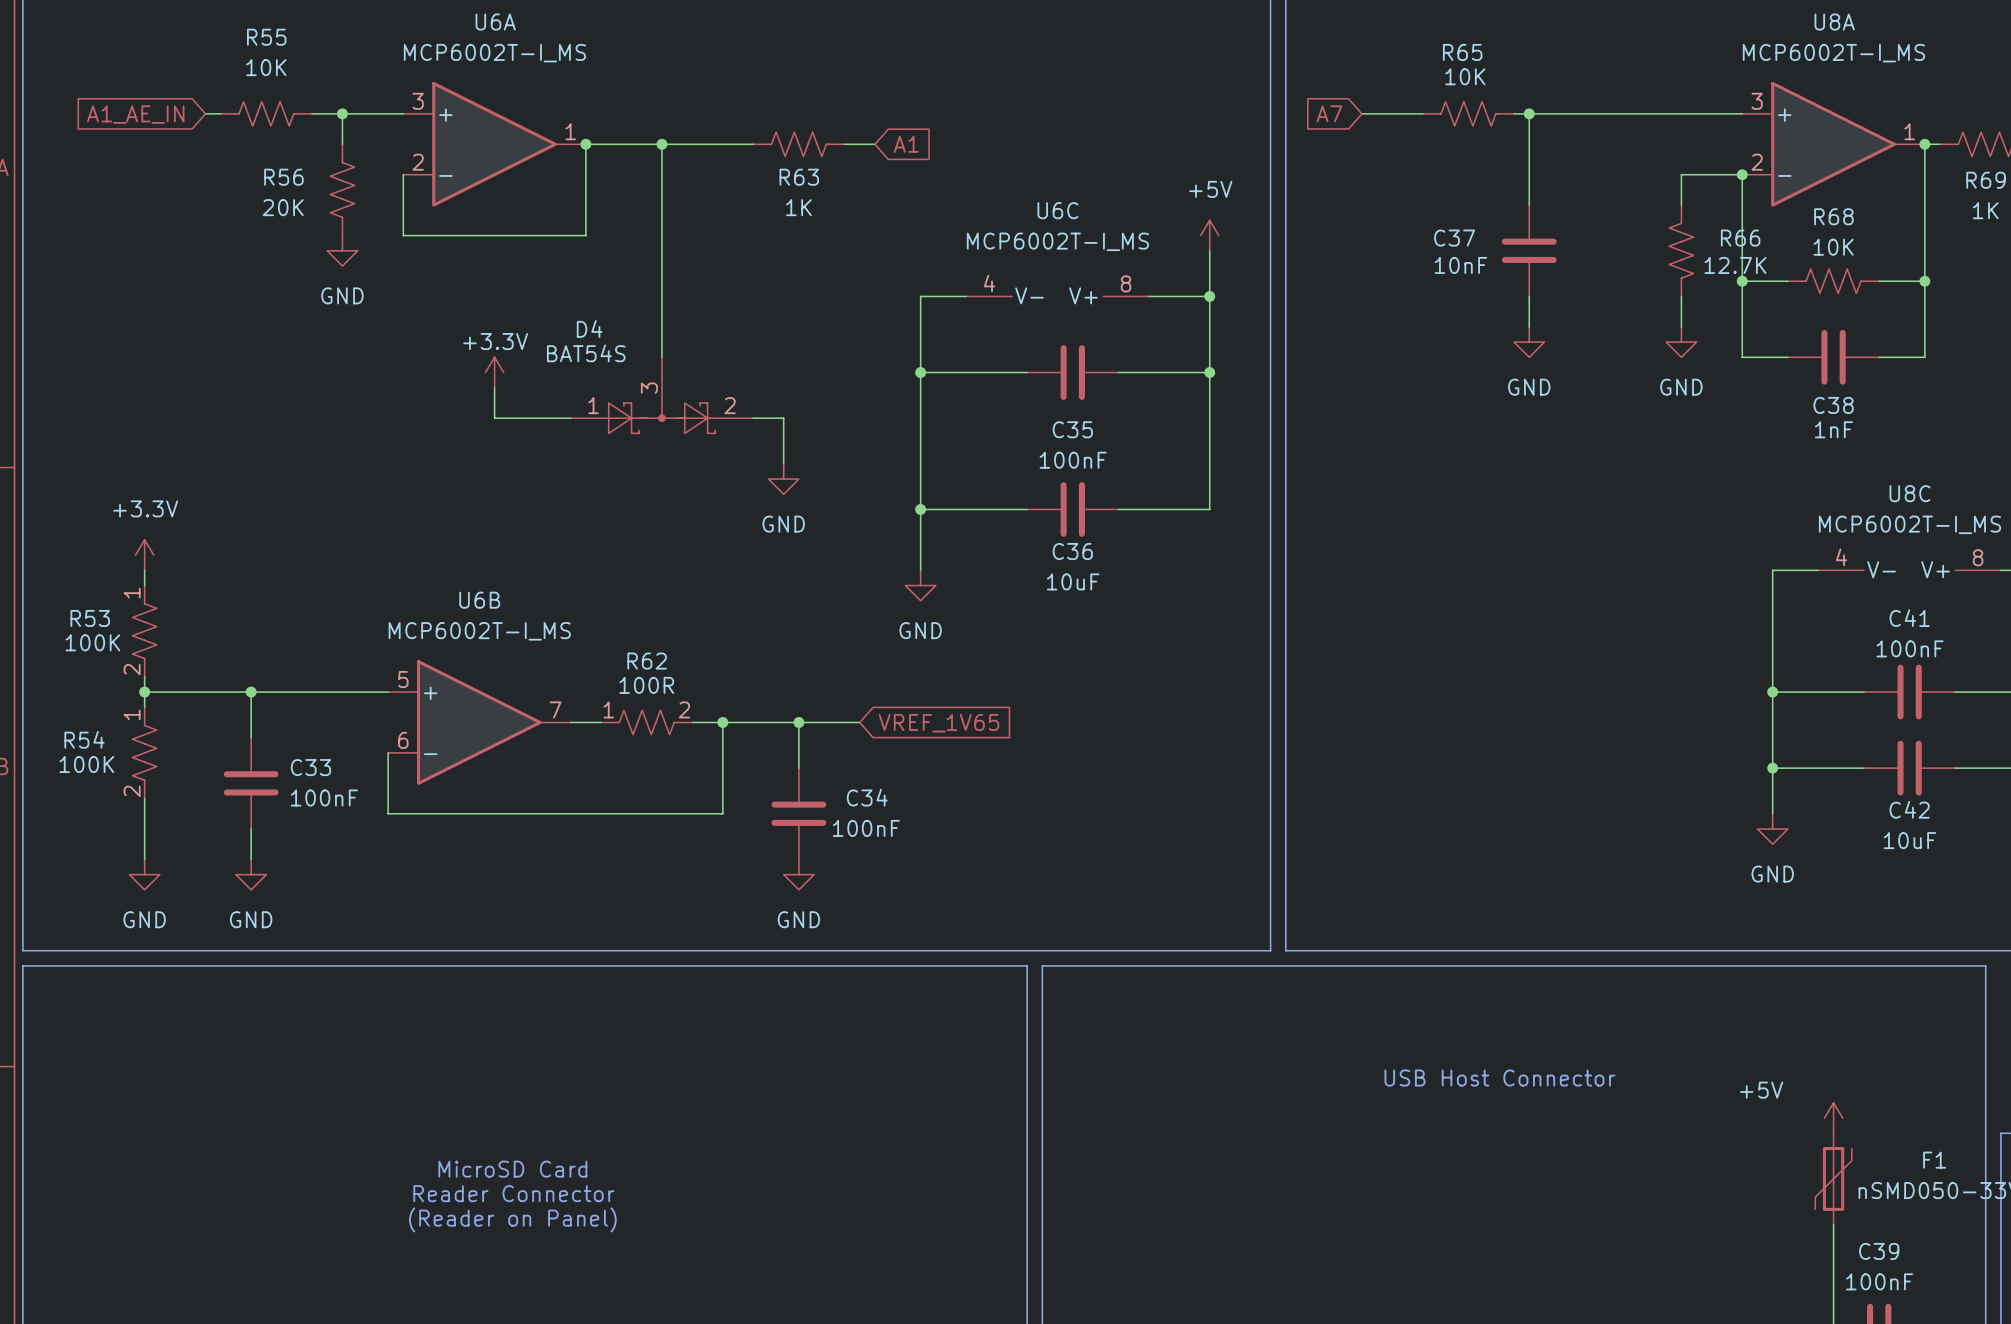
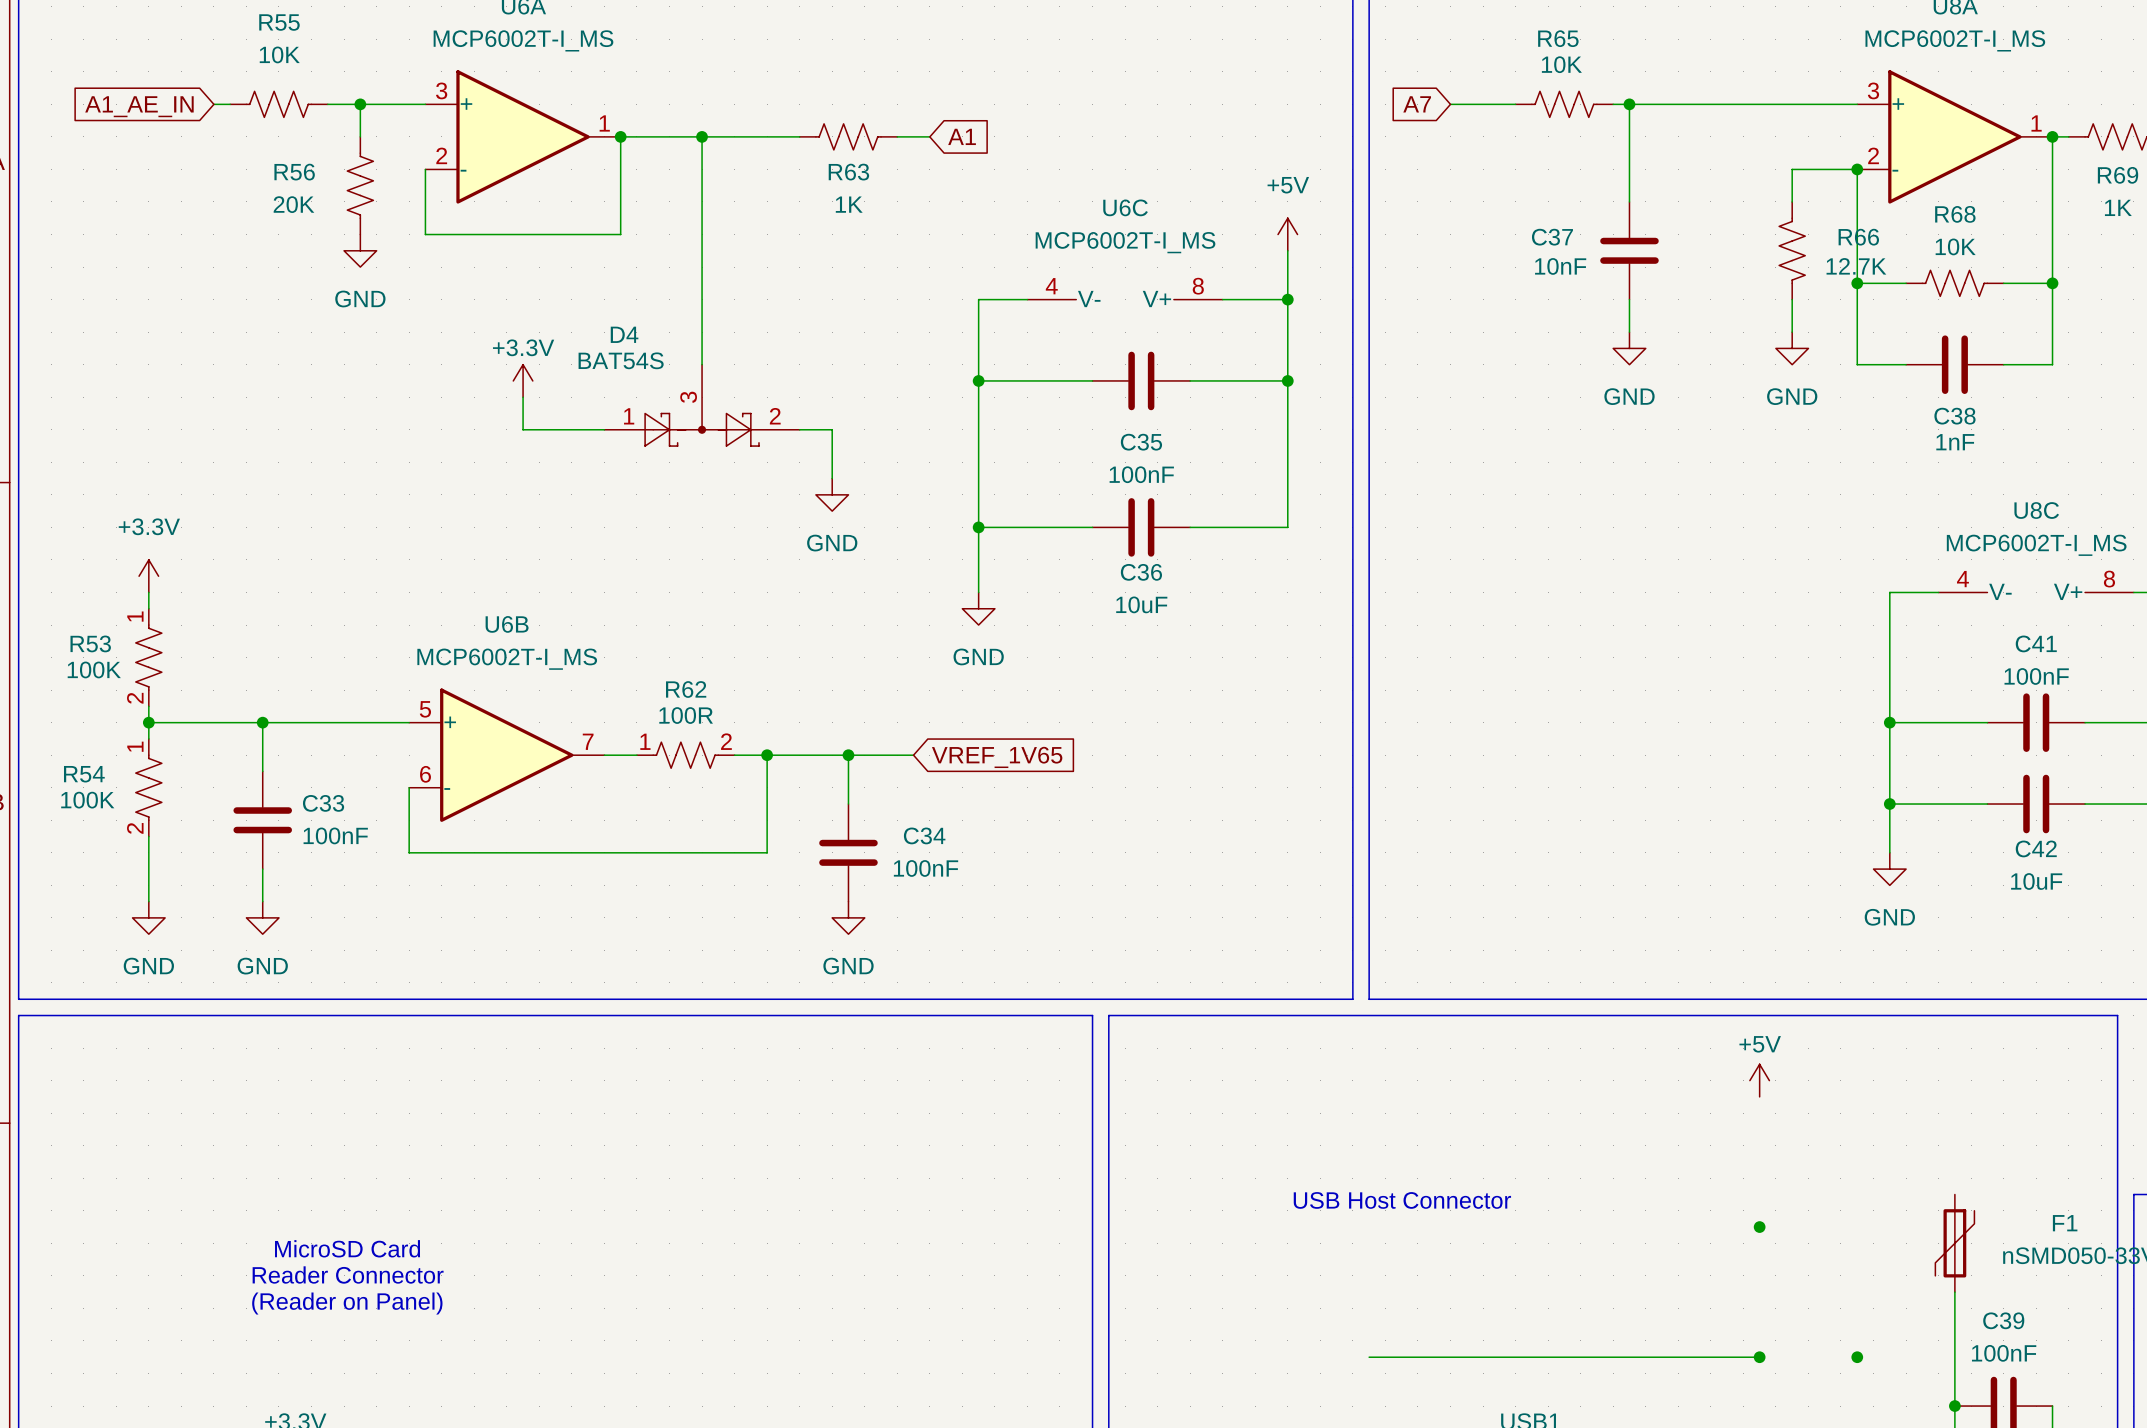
text position: USB Host Connector (1499, 1078) -> USB Host Connector (1402, 1200)
power symbol text position: +5V (1761, 1090) -> +5V (1760, 1044)
power symbol position: +5V (1833, 1118) -> +5V (1759, 1080)
junction: none -> (1759, 1227)
text position: MicroSD Card (512, 1169) -> MicroSD Card (347, 1248)
text position: Reader Connector (513, 1193) -> Reader Connector (348, 1274)
text position: (Reader on Panel) (512, 1219) -> (Reader on Panel) (347, 1303)
wire: none -> (1369, 1357) (1759, 1357)
junction: none -> (1759, 1357)
junction: none -> (1857, 1357)

